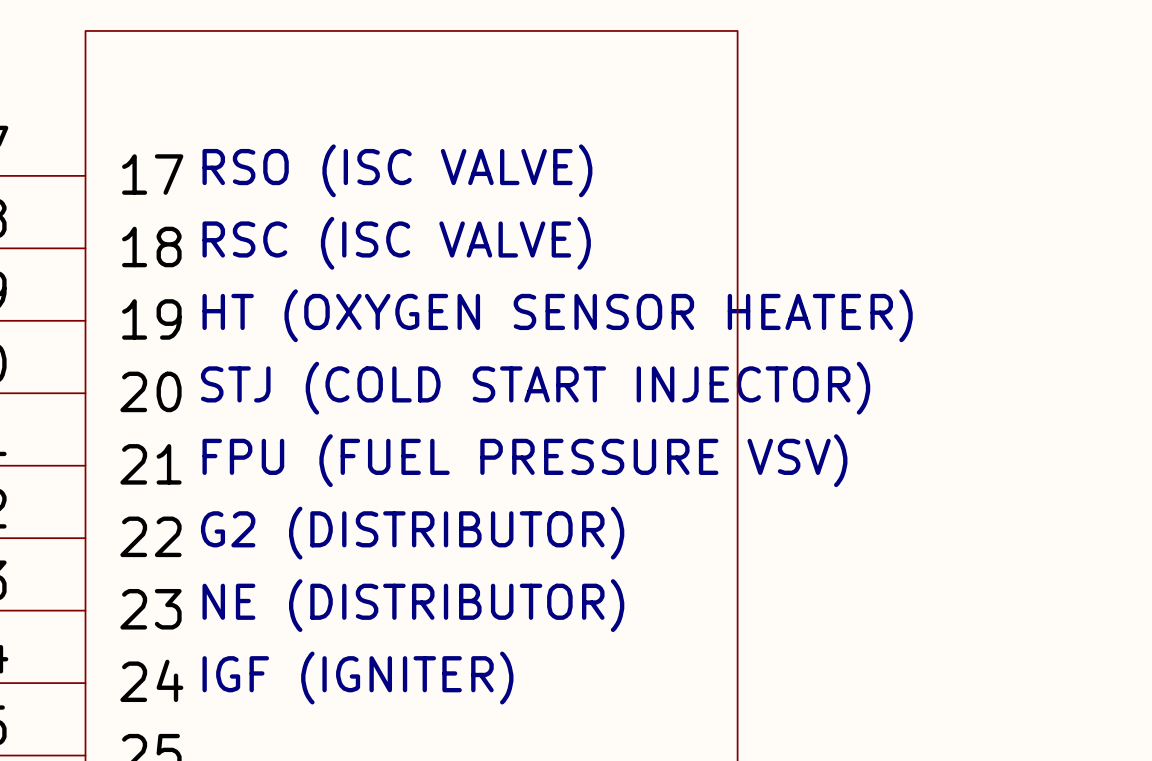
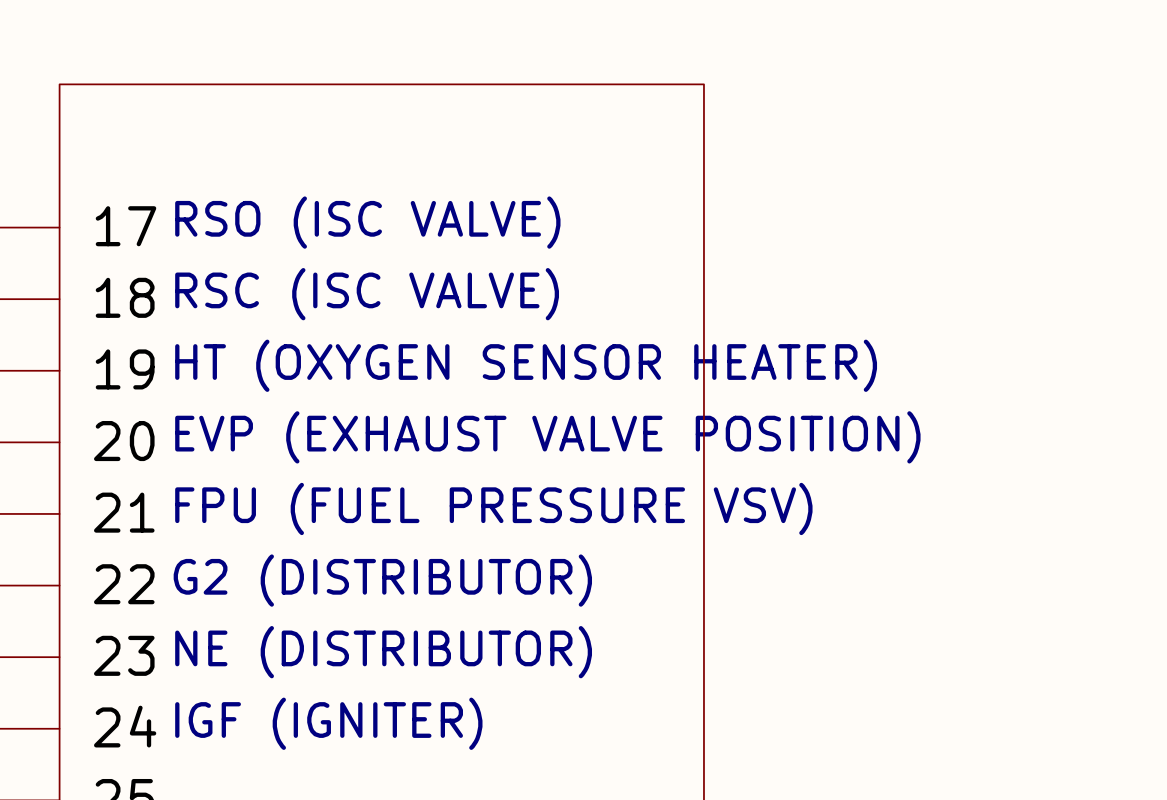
text: STJ (COLD START INJECTOR) (535, 388) -> EVP (EXHAUST VALVE POSITION) (547, 437)

